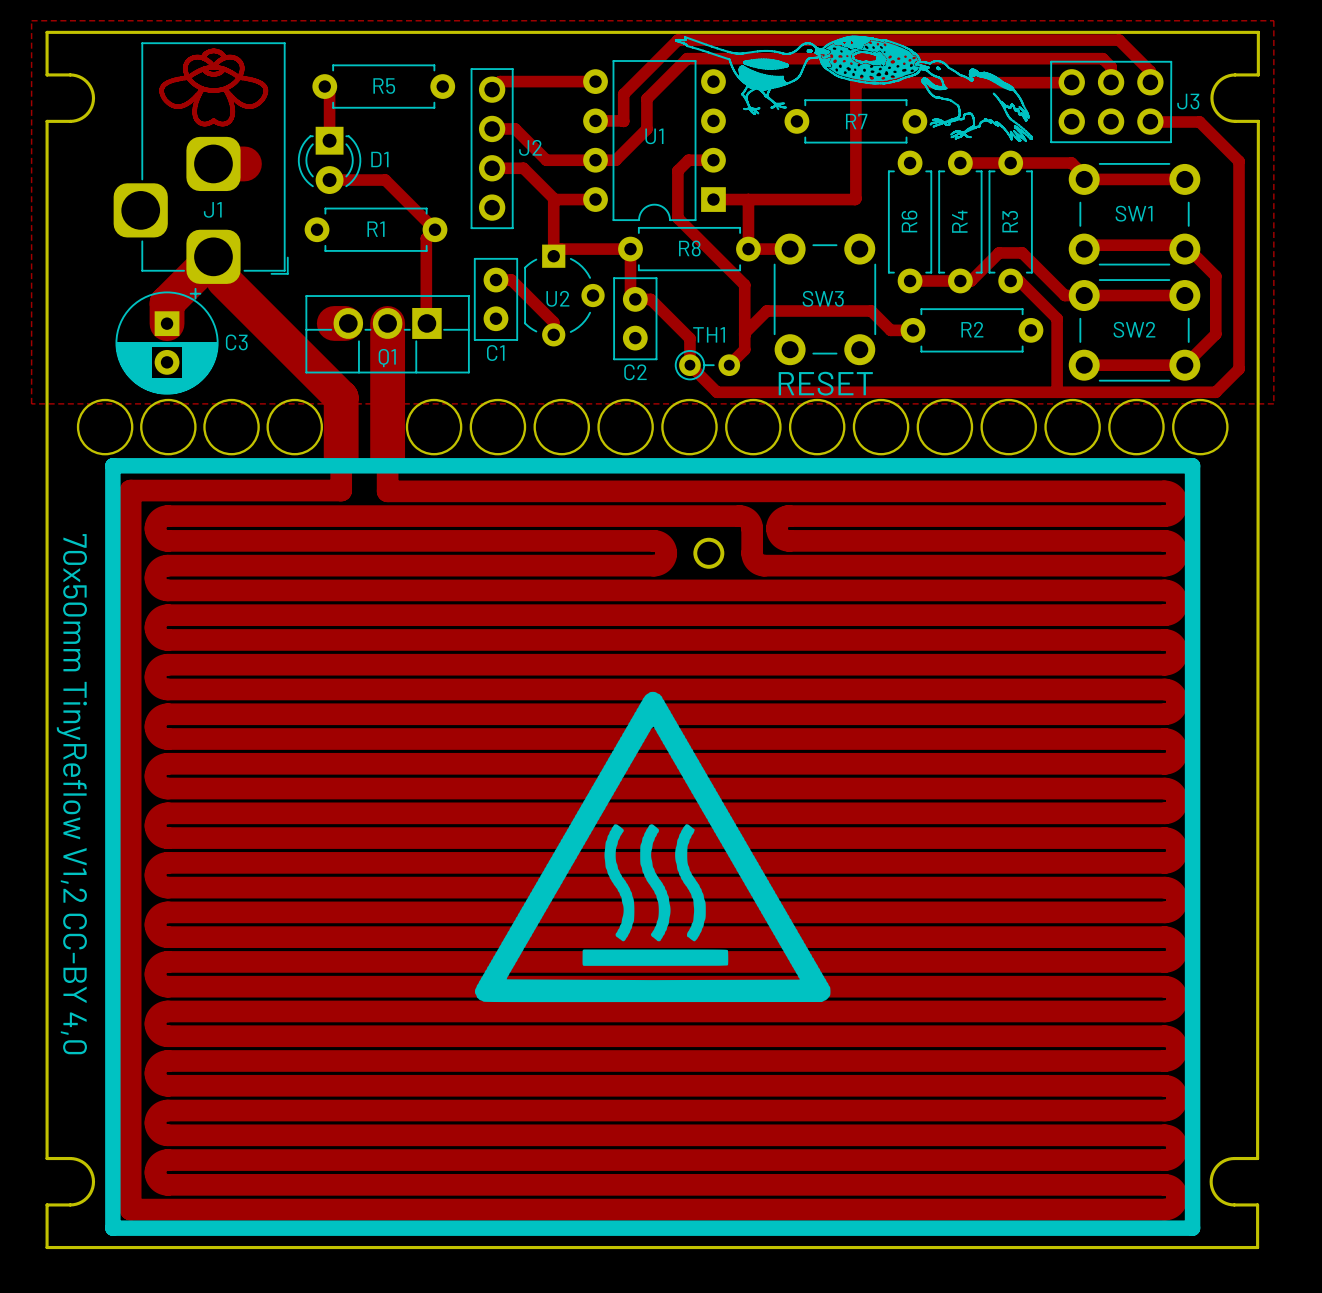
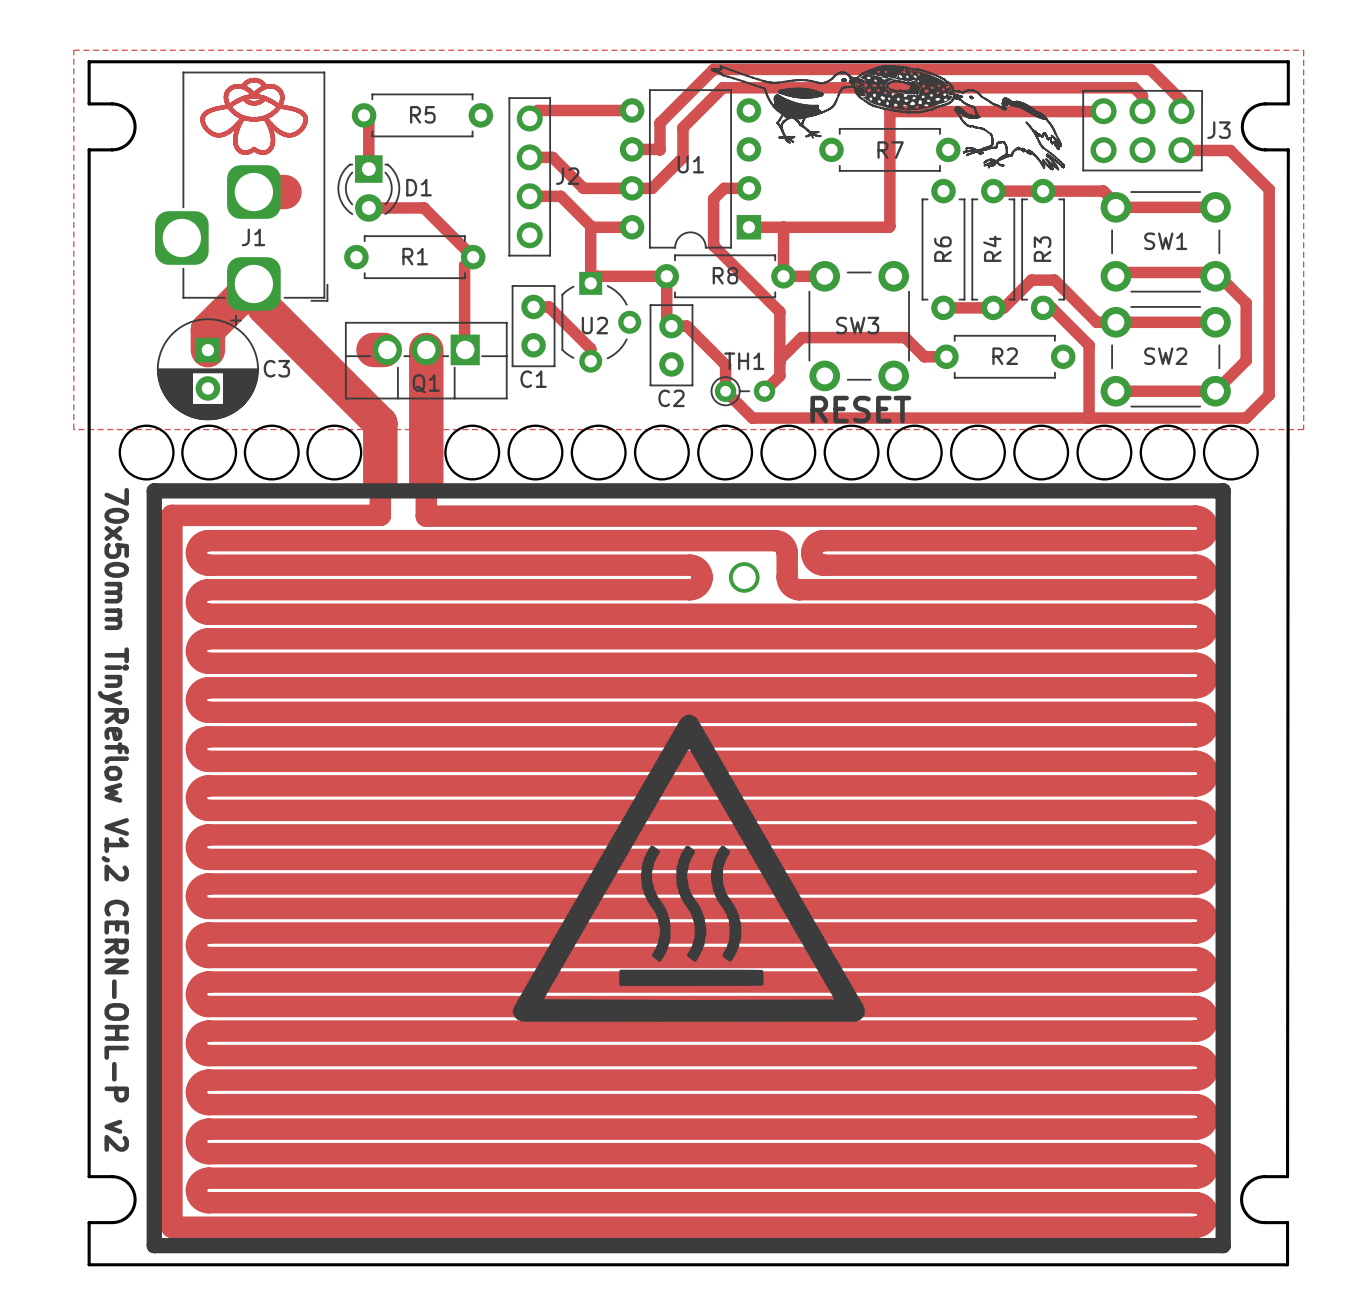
text: 70x50mm TinyReflow V1,2 CC-BY 4,0 (71, 794) -> 70x50mm TinyReflow V1,2 CERN-OHL-P v2 (113, 819)

